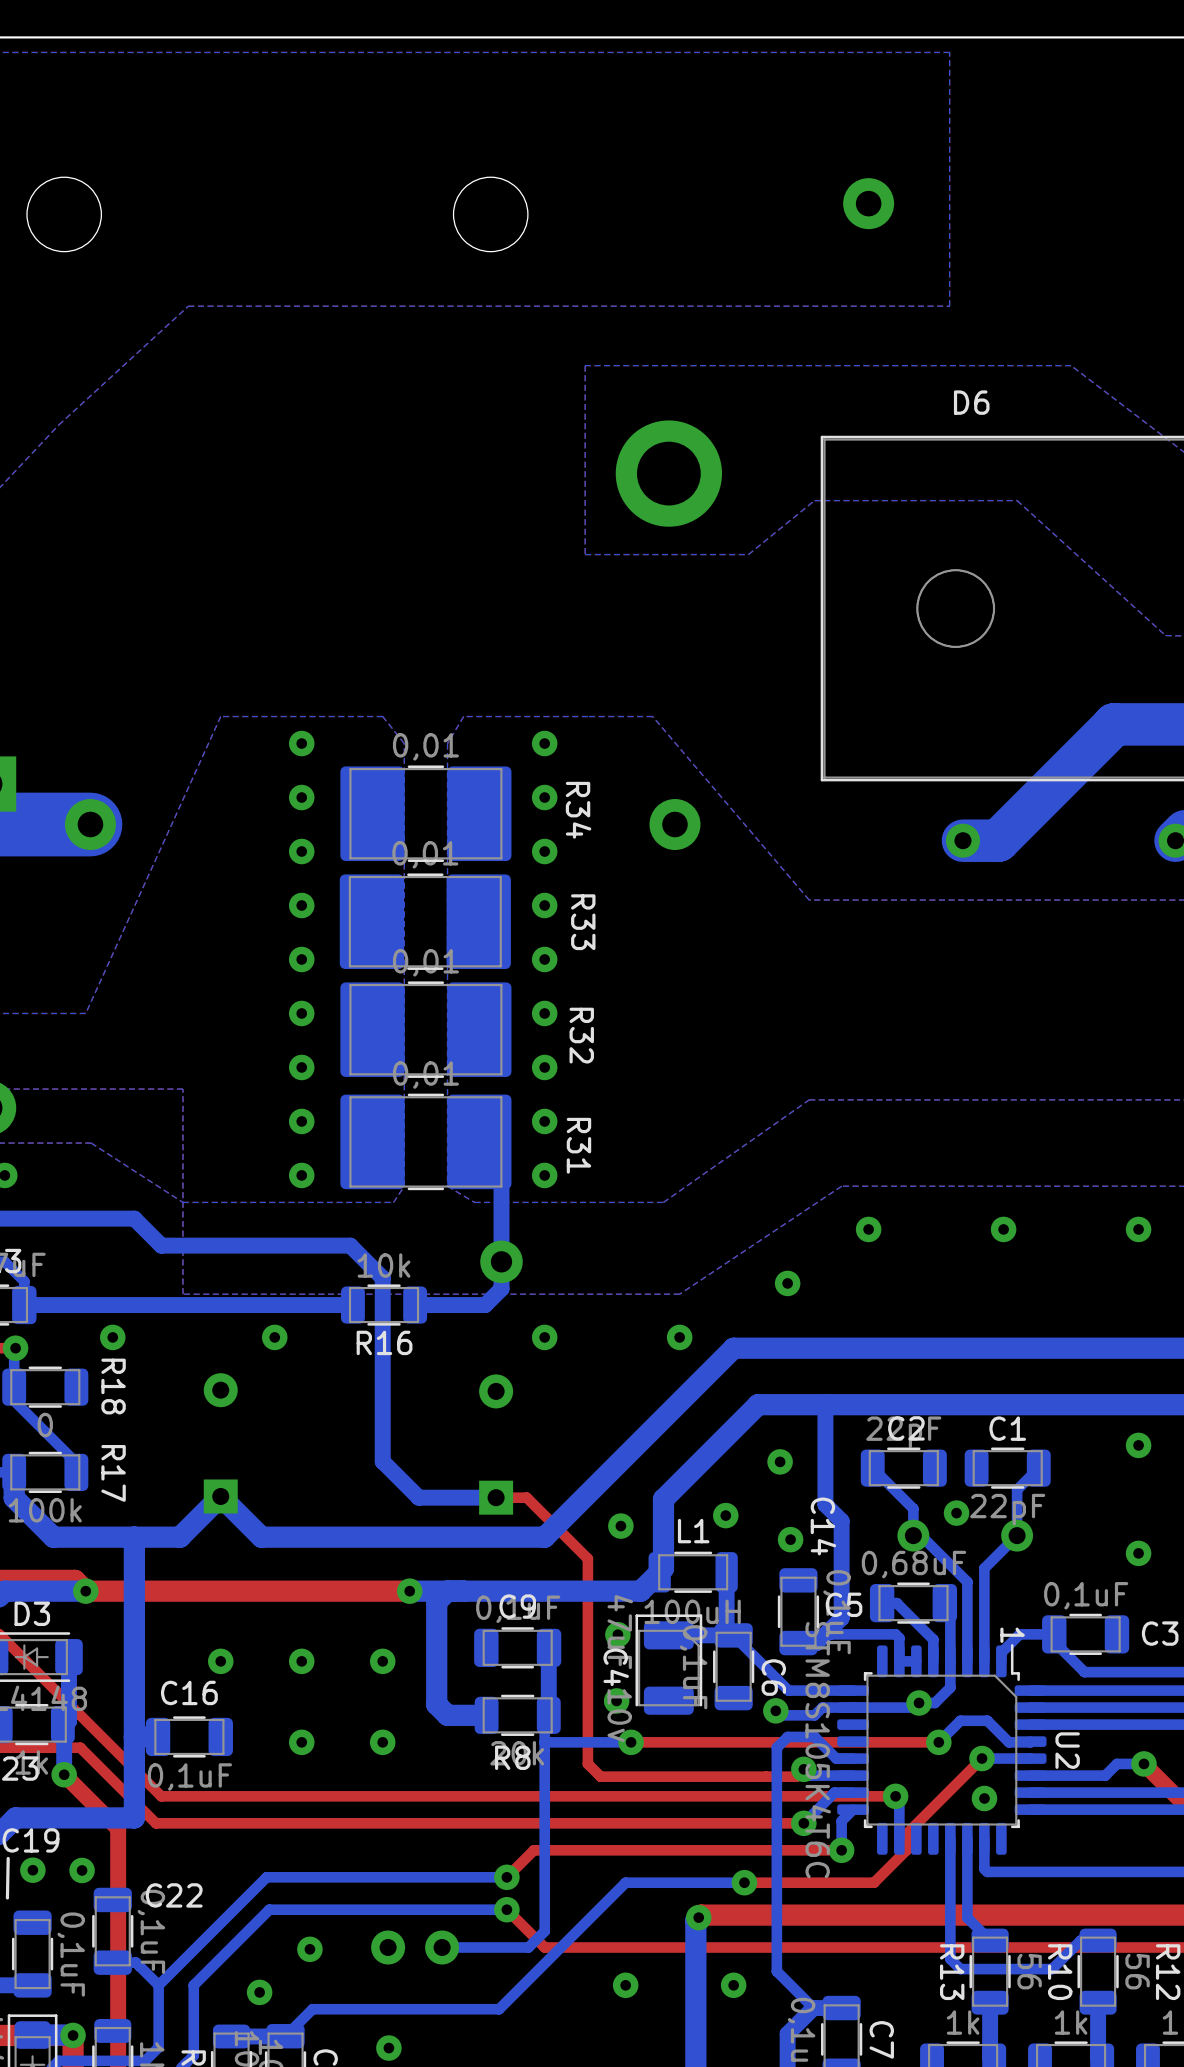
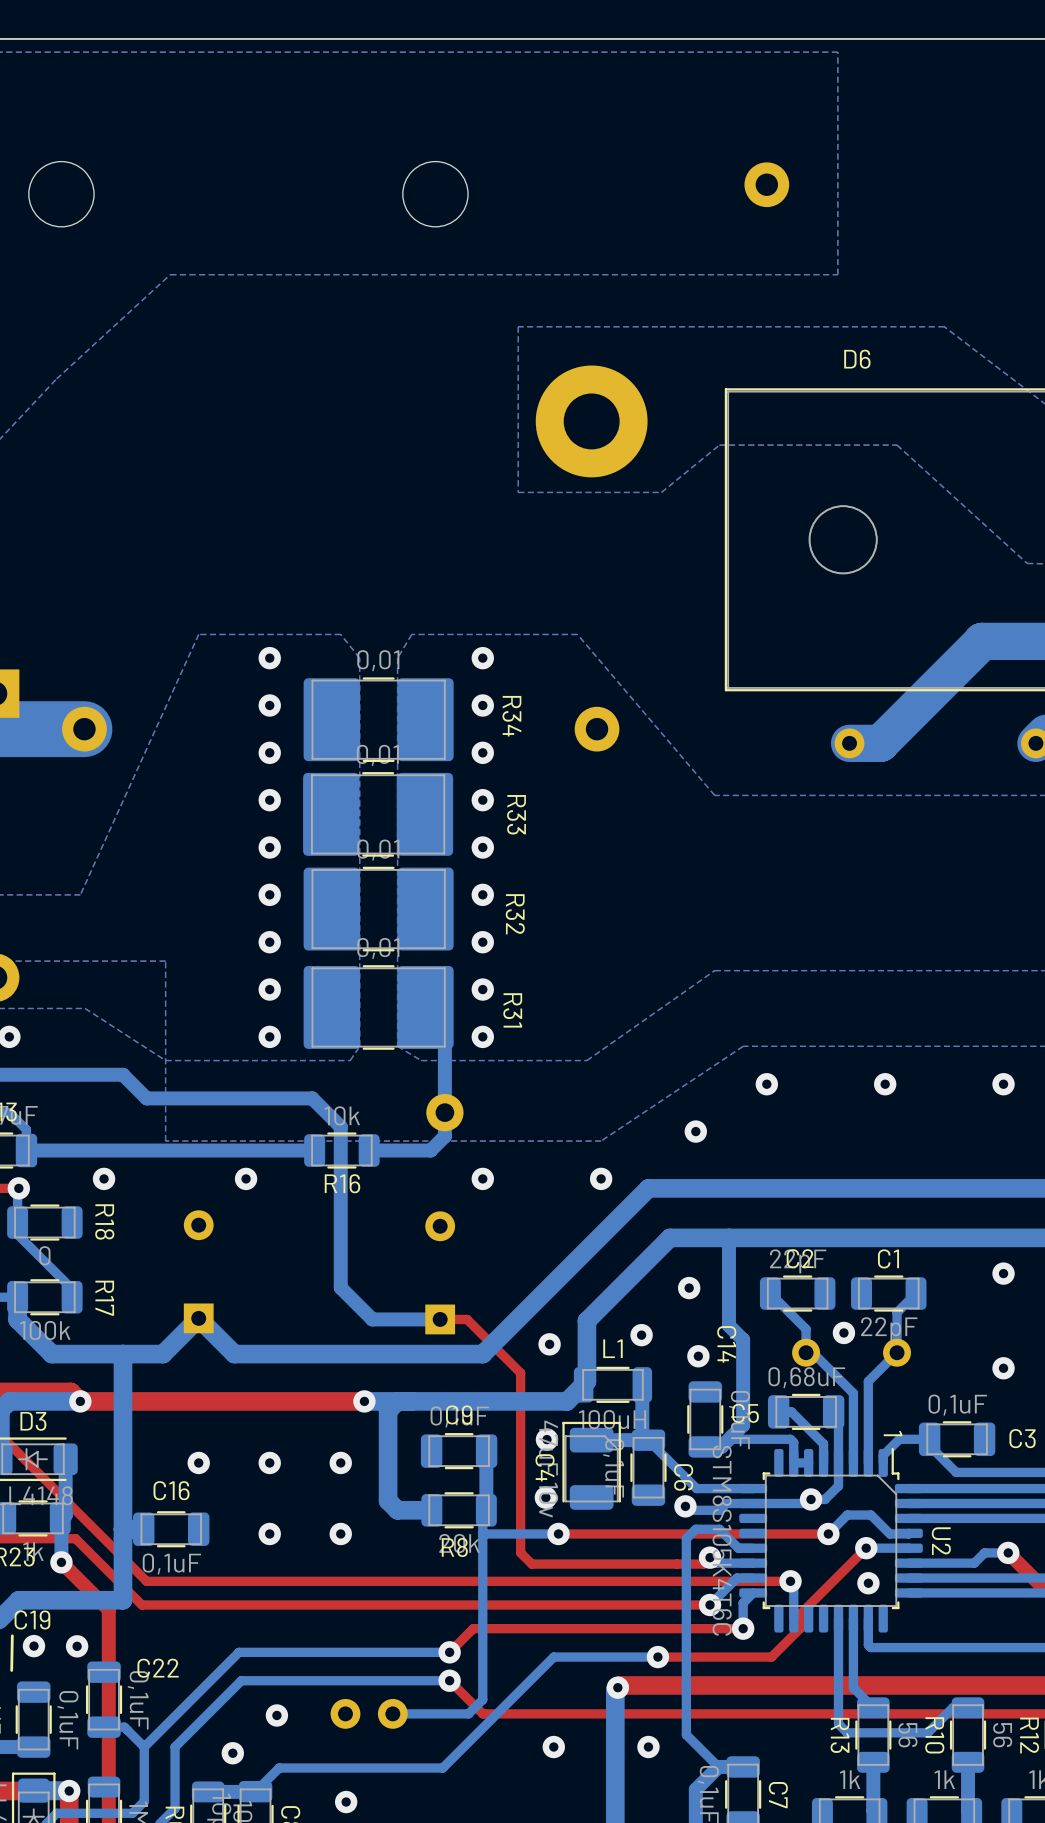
part footprint: [615, 420, 723, 527] -> [535, 365, 648, 478]

